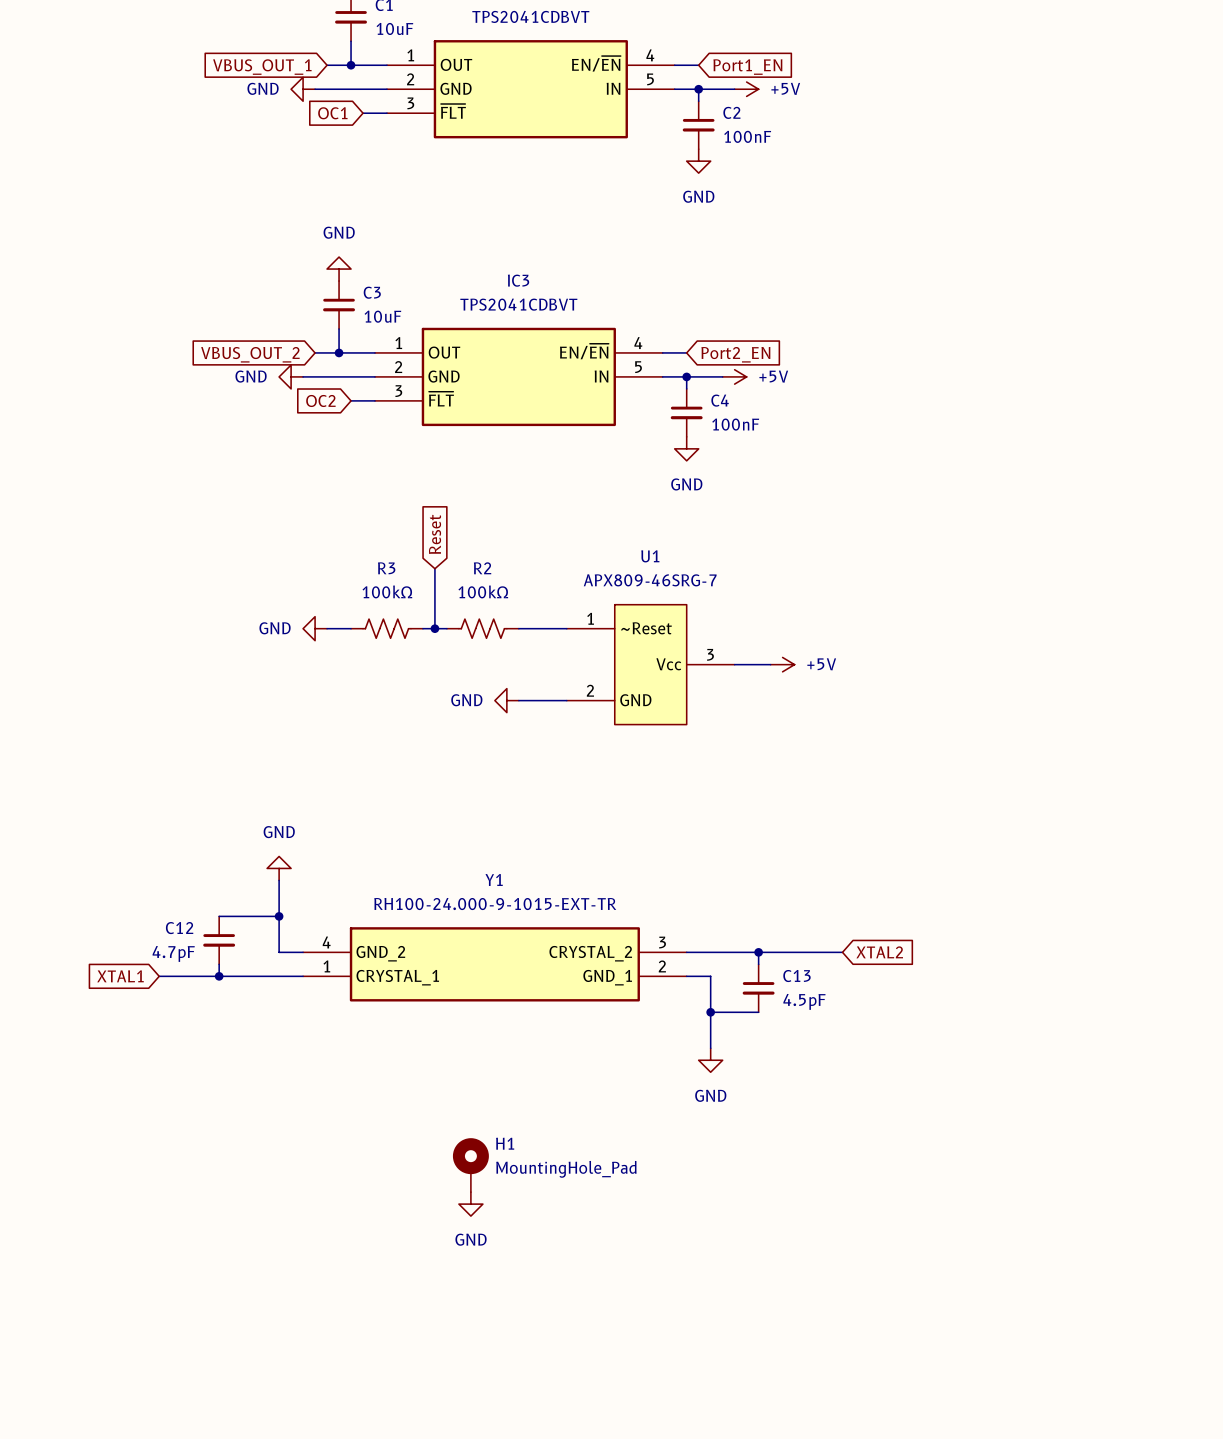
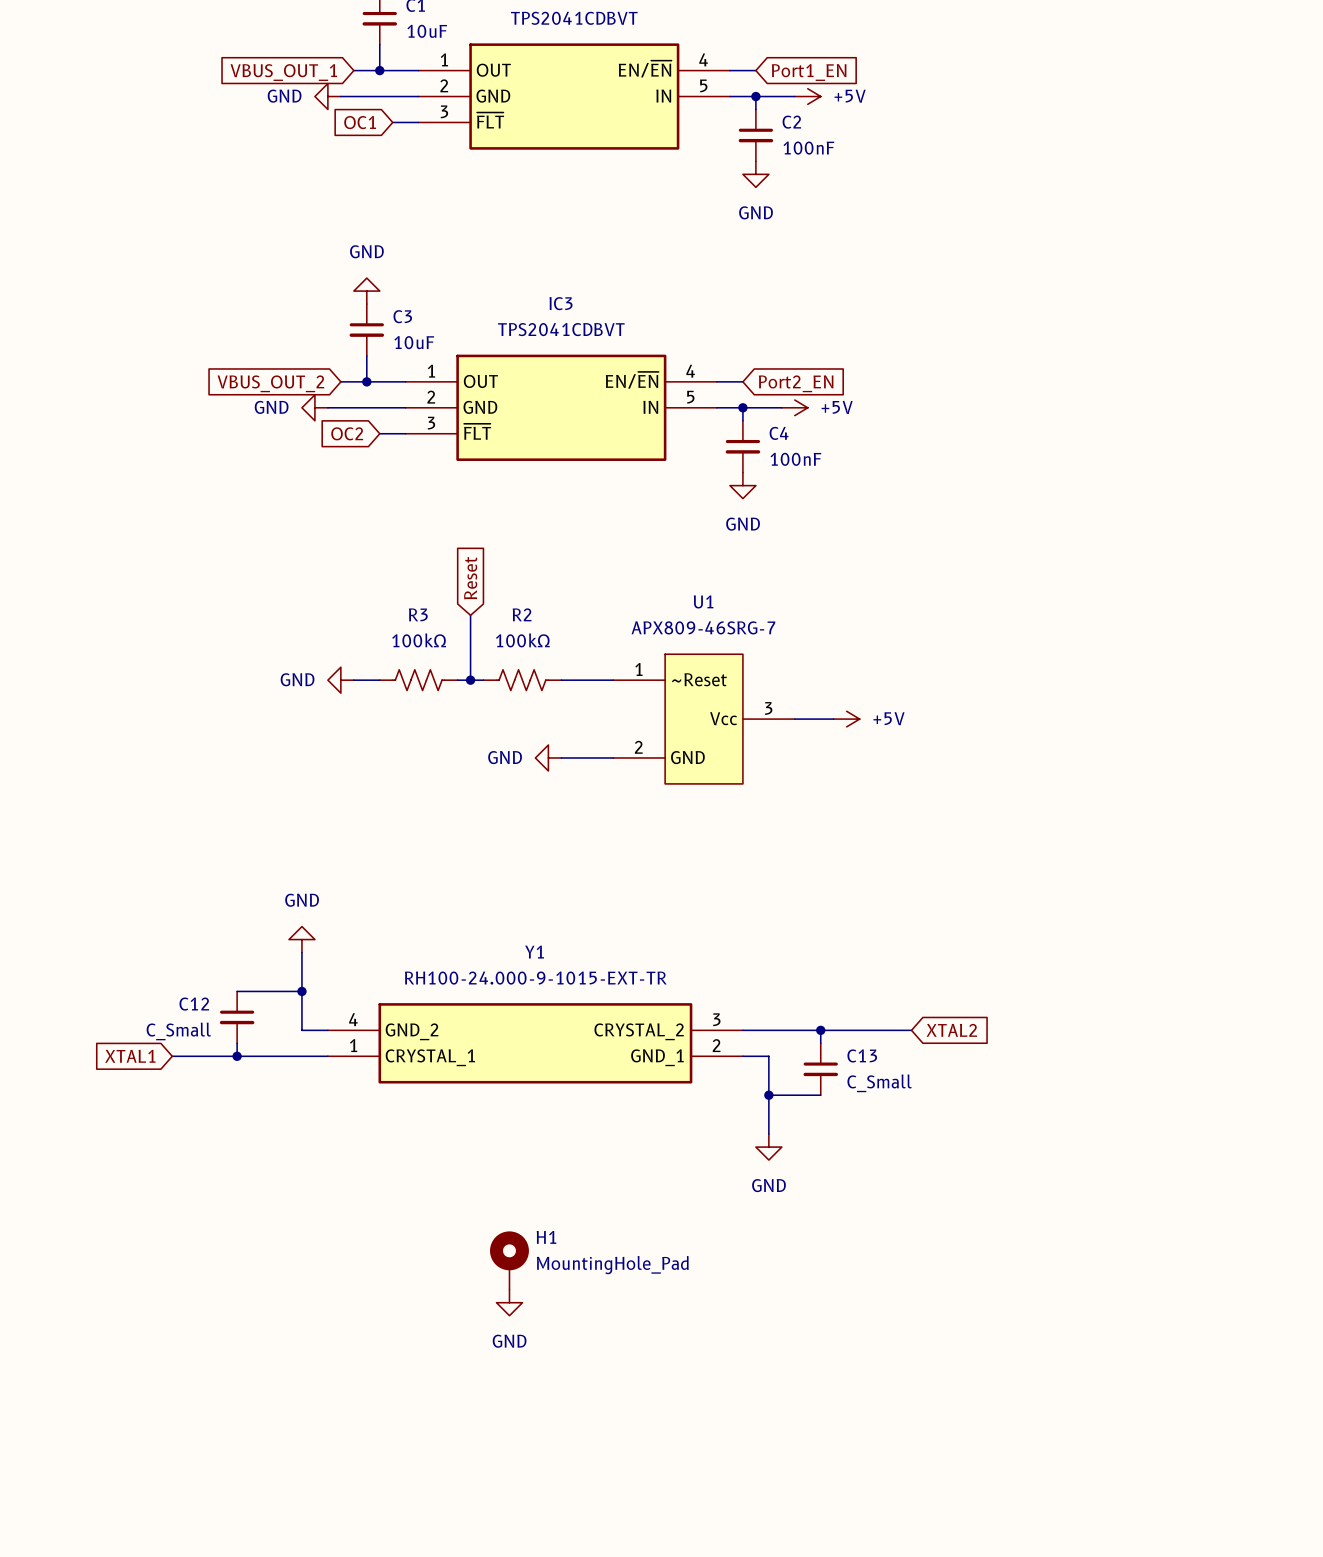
C12 value: 4.7pF (173, 953) -> C_Small (178, 1031)
C13 value: 4.5pF (804, 1001) -> C_Small (879, 1083)

